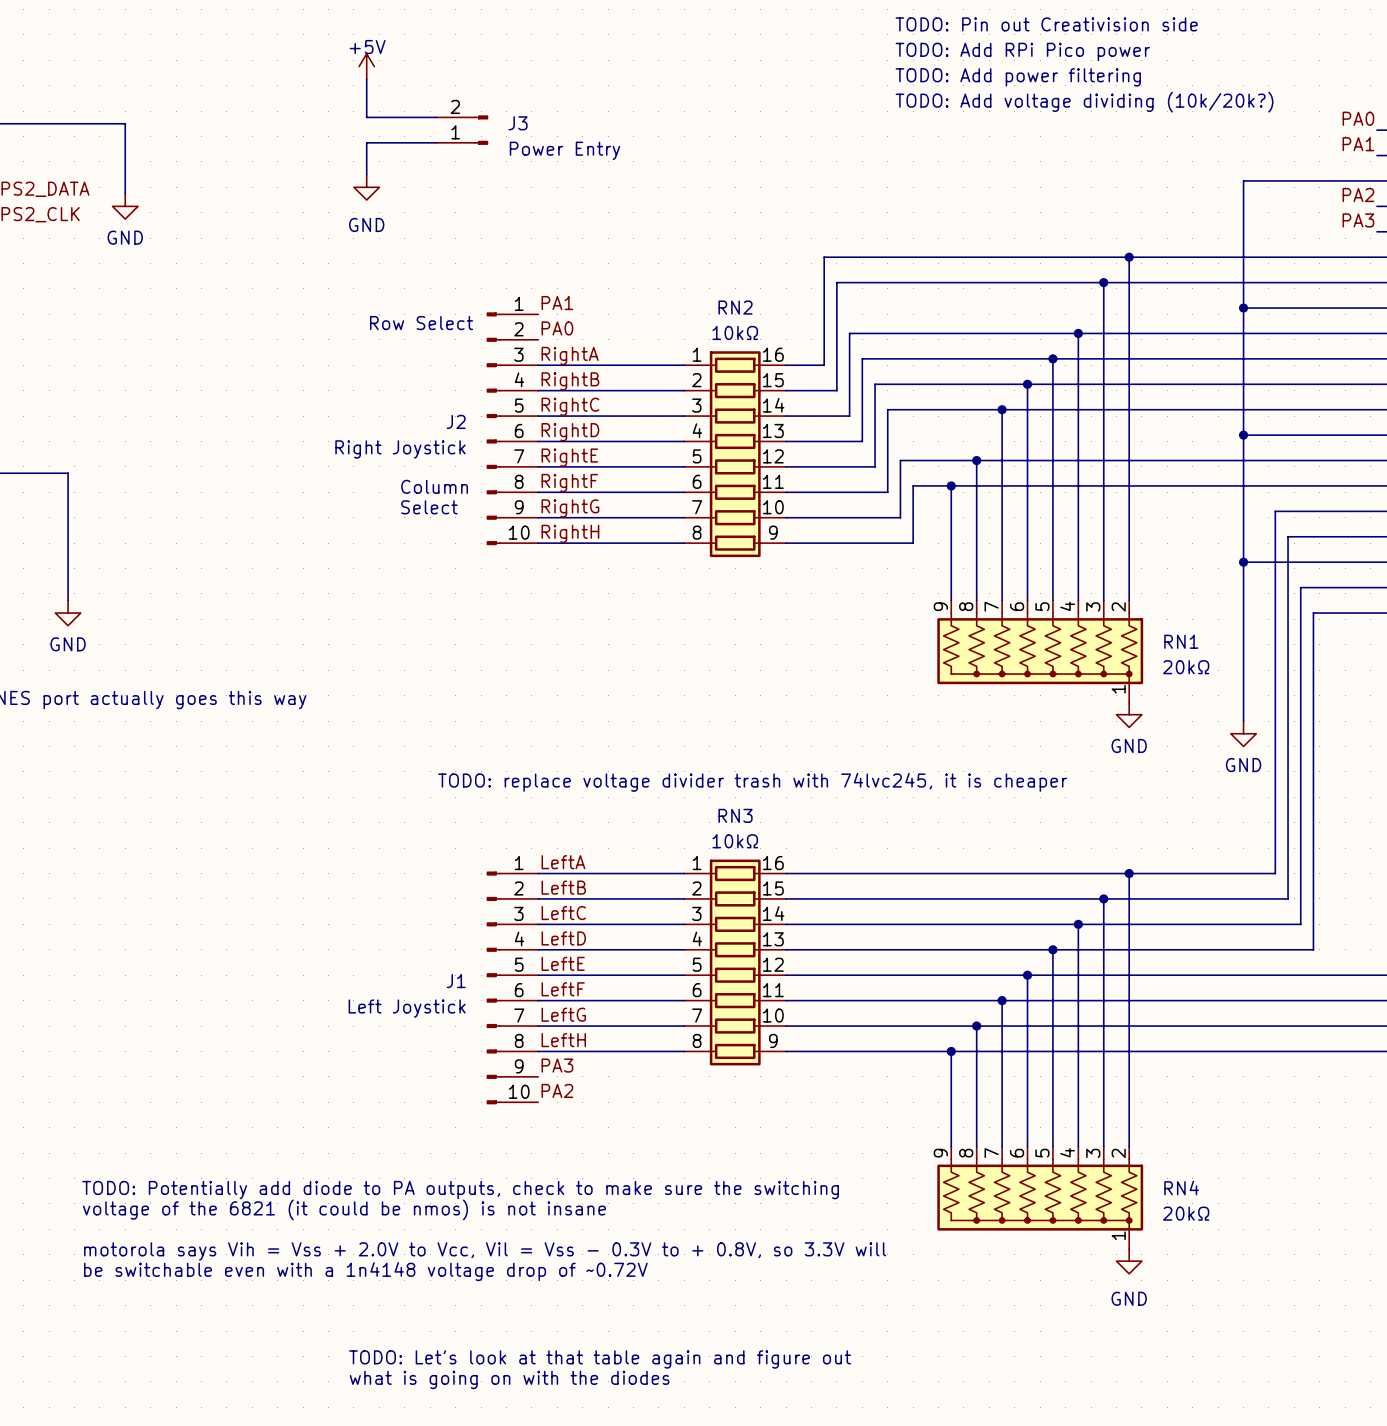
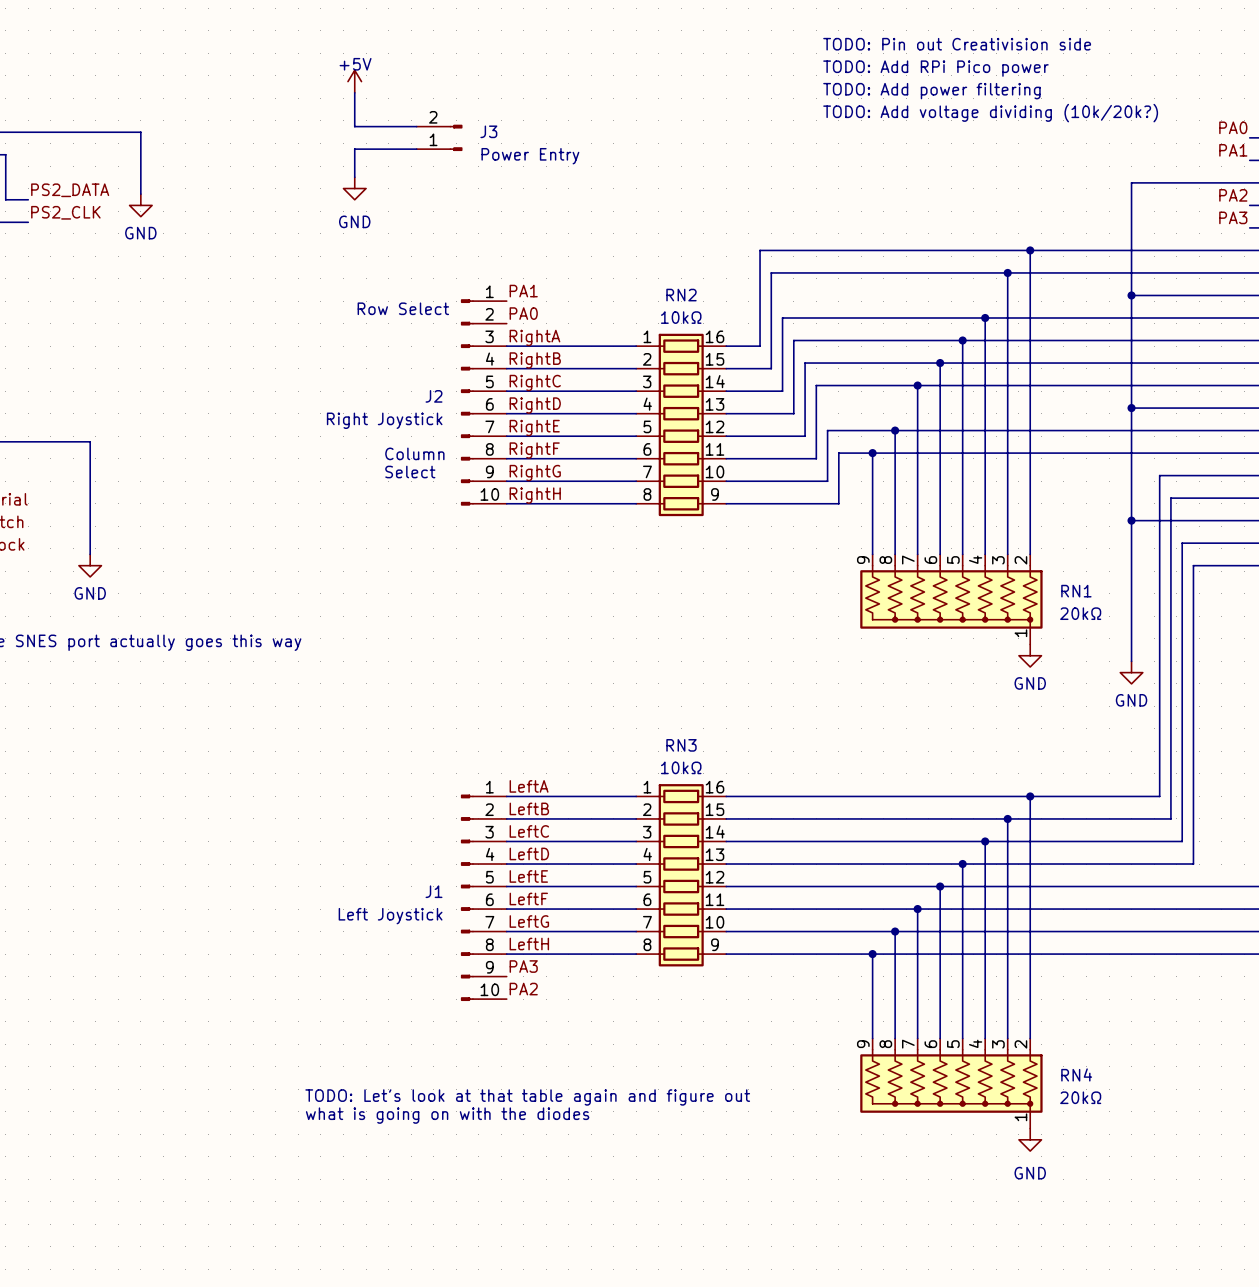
text: TODO: replace voltage divider trash with 74lvc245, it is cheaper (752, 782) -> none
text: TODO: Potentially add diode to PA outputs, check to make sure the switching (460, 1190) -> none
text: voltage of the 6821 (it could be nmos) is not insane (344, 1209) -> none
text: motorola says Vih = Vss + 2.0V to Vcc, Vil = Vss - 0.3V to + 0.8V, so 3.3V will (485, 1251) -> none
text: be switchable even with a 1n4148 voltage drop of ~0.72V (365, 1271) -> none
text position: TODO: Let's look at that table again and figure out (600, 1359) -> TODO: Let's look at that table again and figure out (527, 1097)
text position: what is going on with the diodes (509, 1379) -> what is going on with the diodes (447, 1115)

